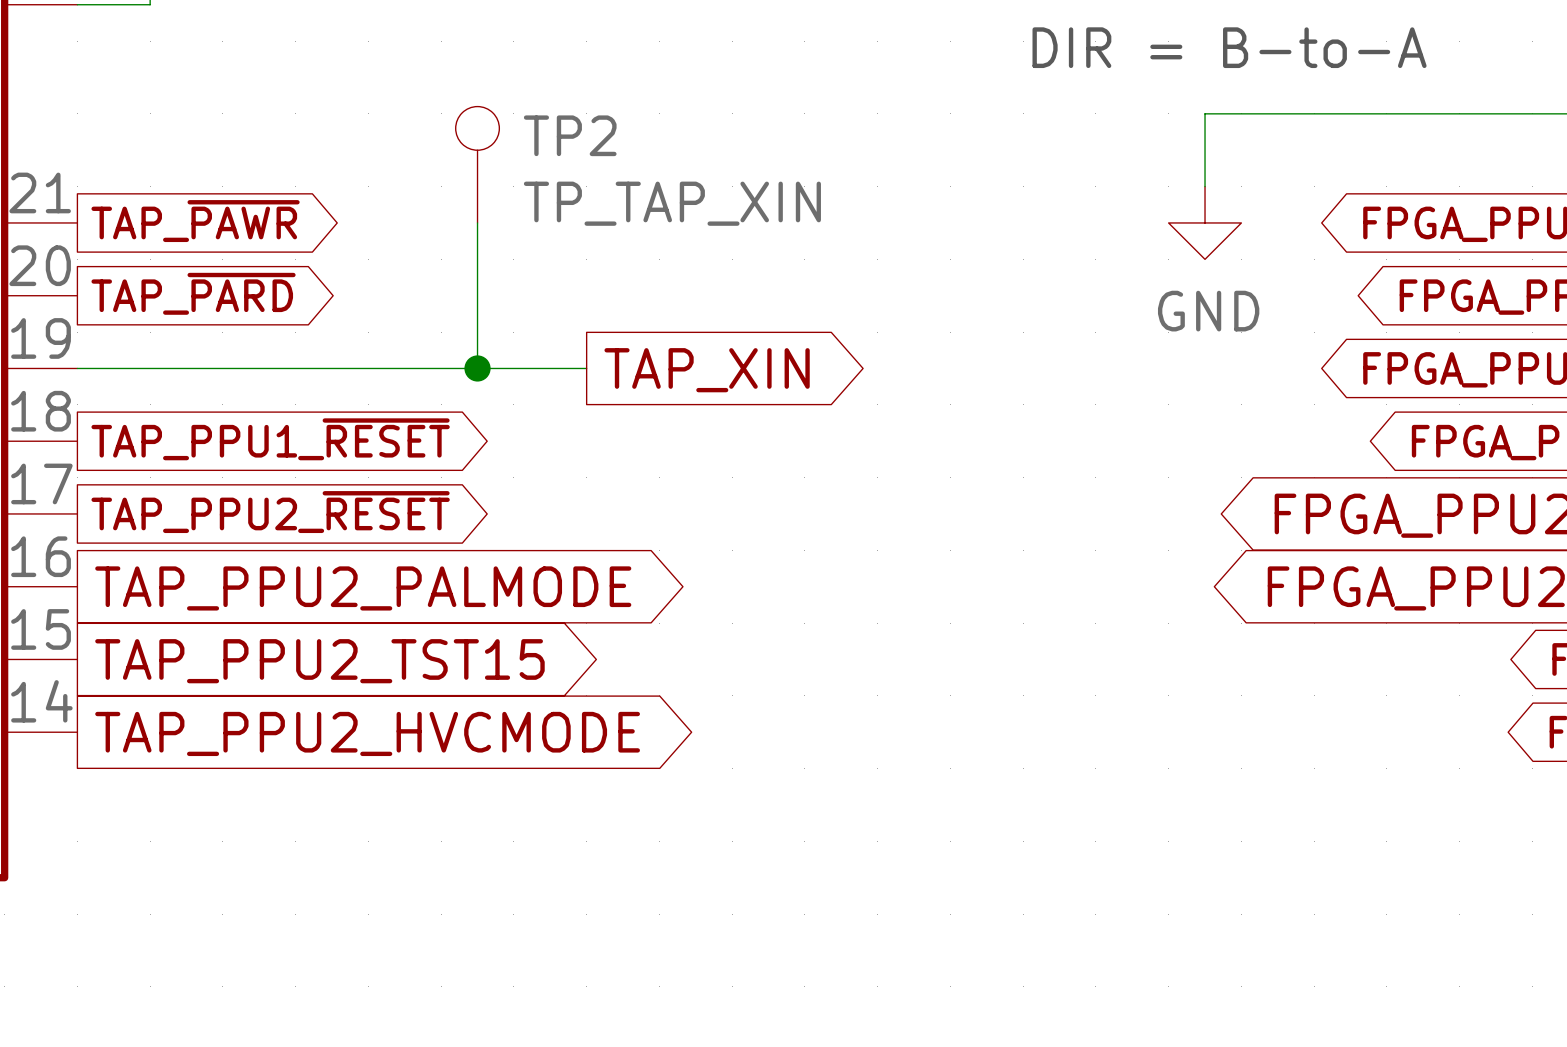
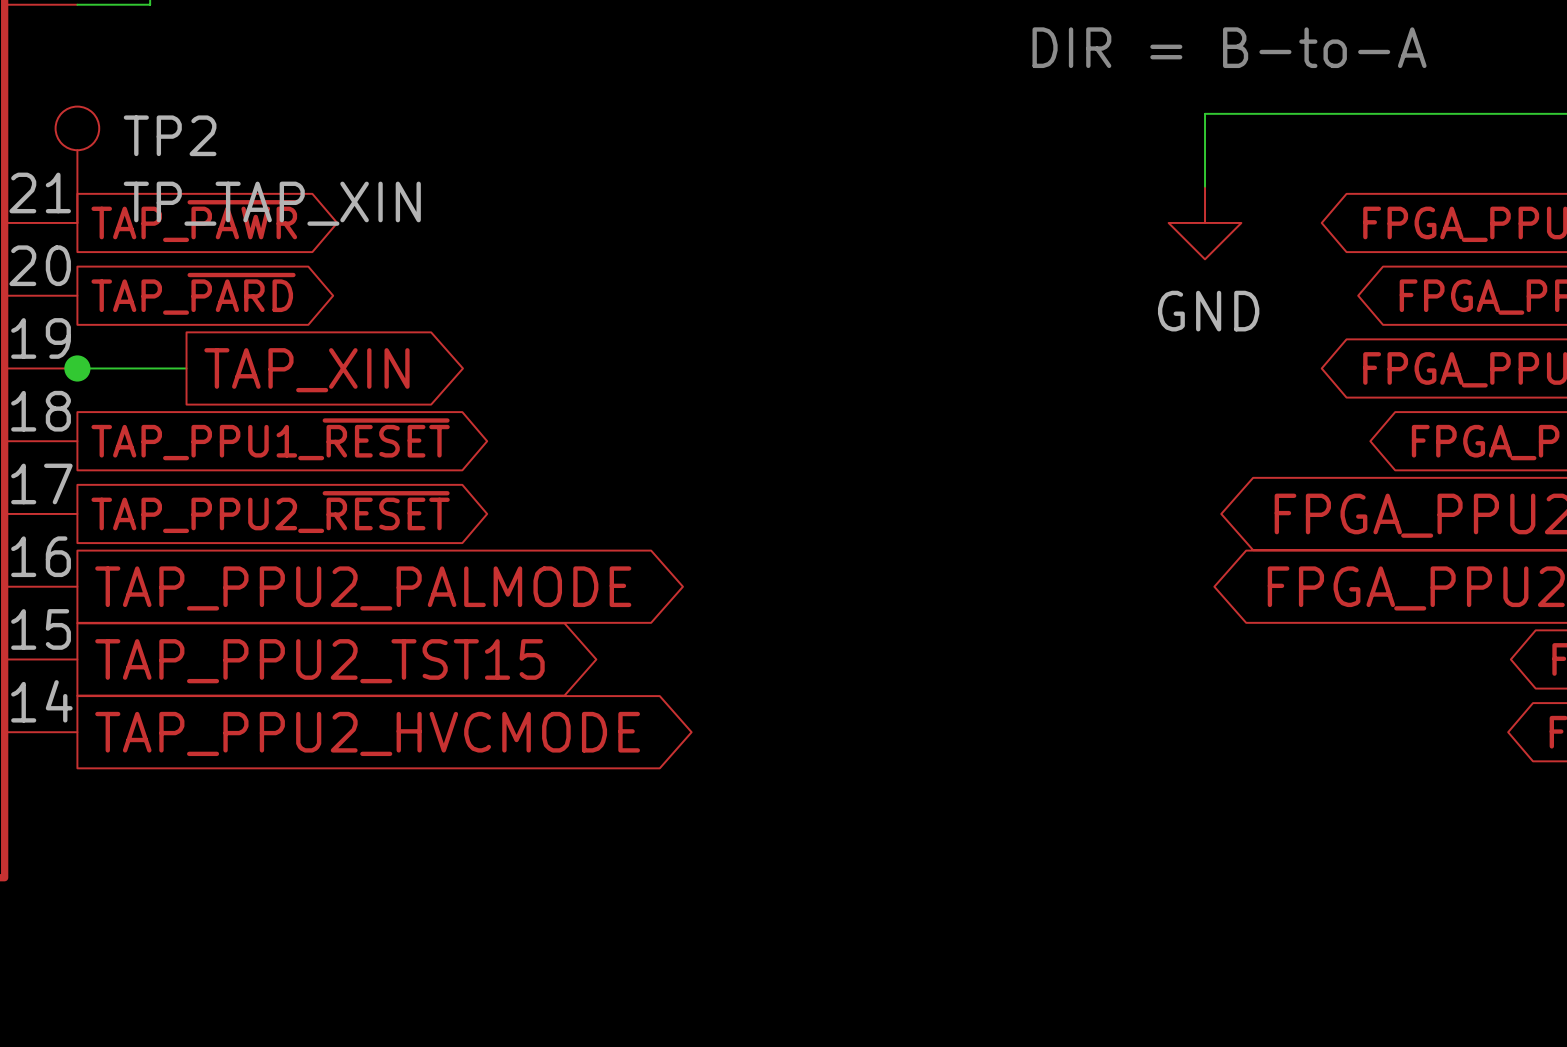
TP2 position: (477, 164) -> (77, 164)
wire: (477, 222) (477, 368) -> none
junction: none -> (77, 368)
wire: (186, 368) (586, 368) -> none
junction: (477, 368) -> none
global label position: TAP_XIN (707, 370) -> TAP_XIN (306, 370)

